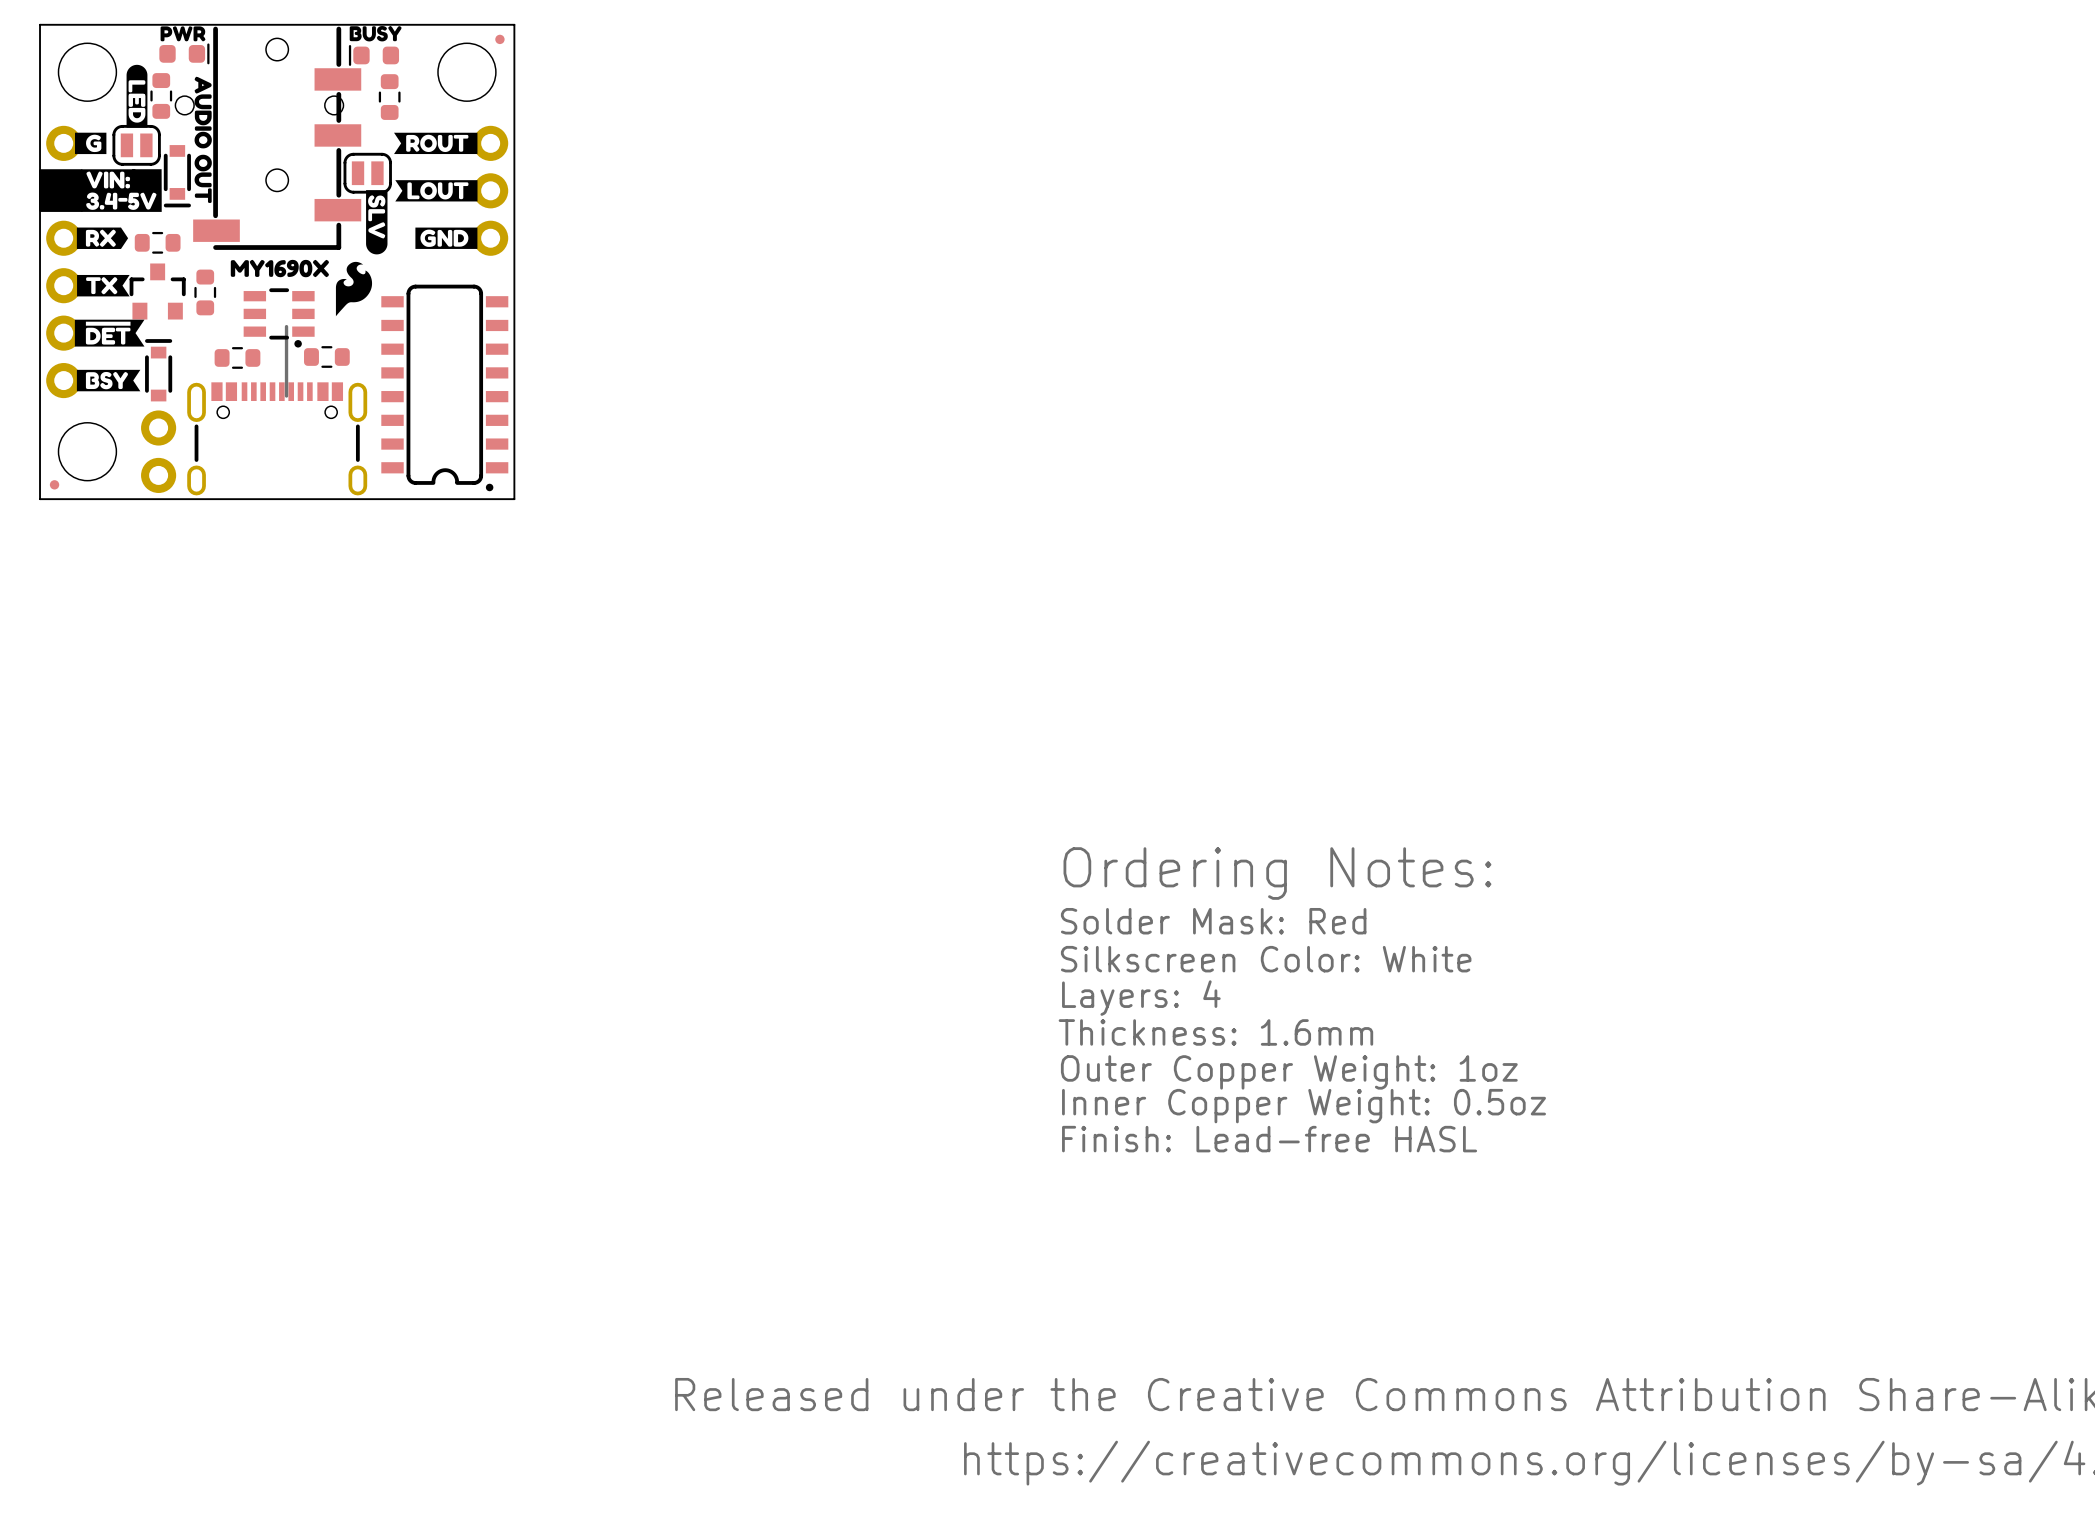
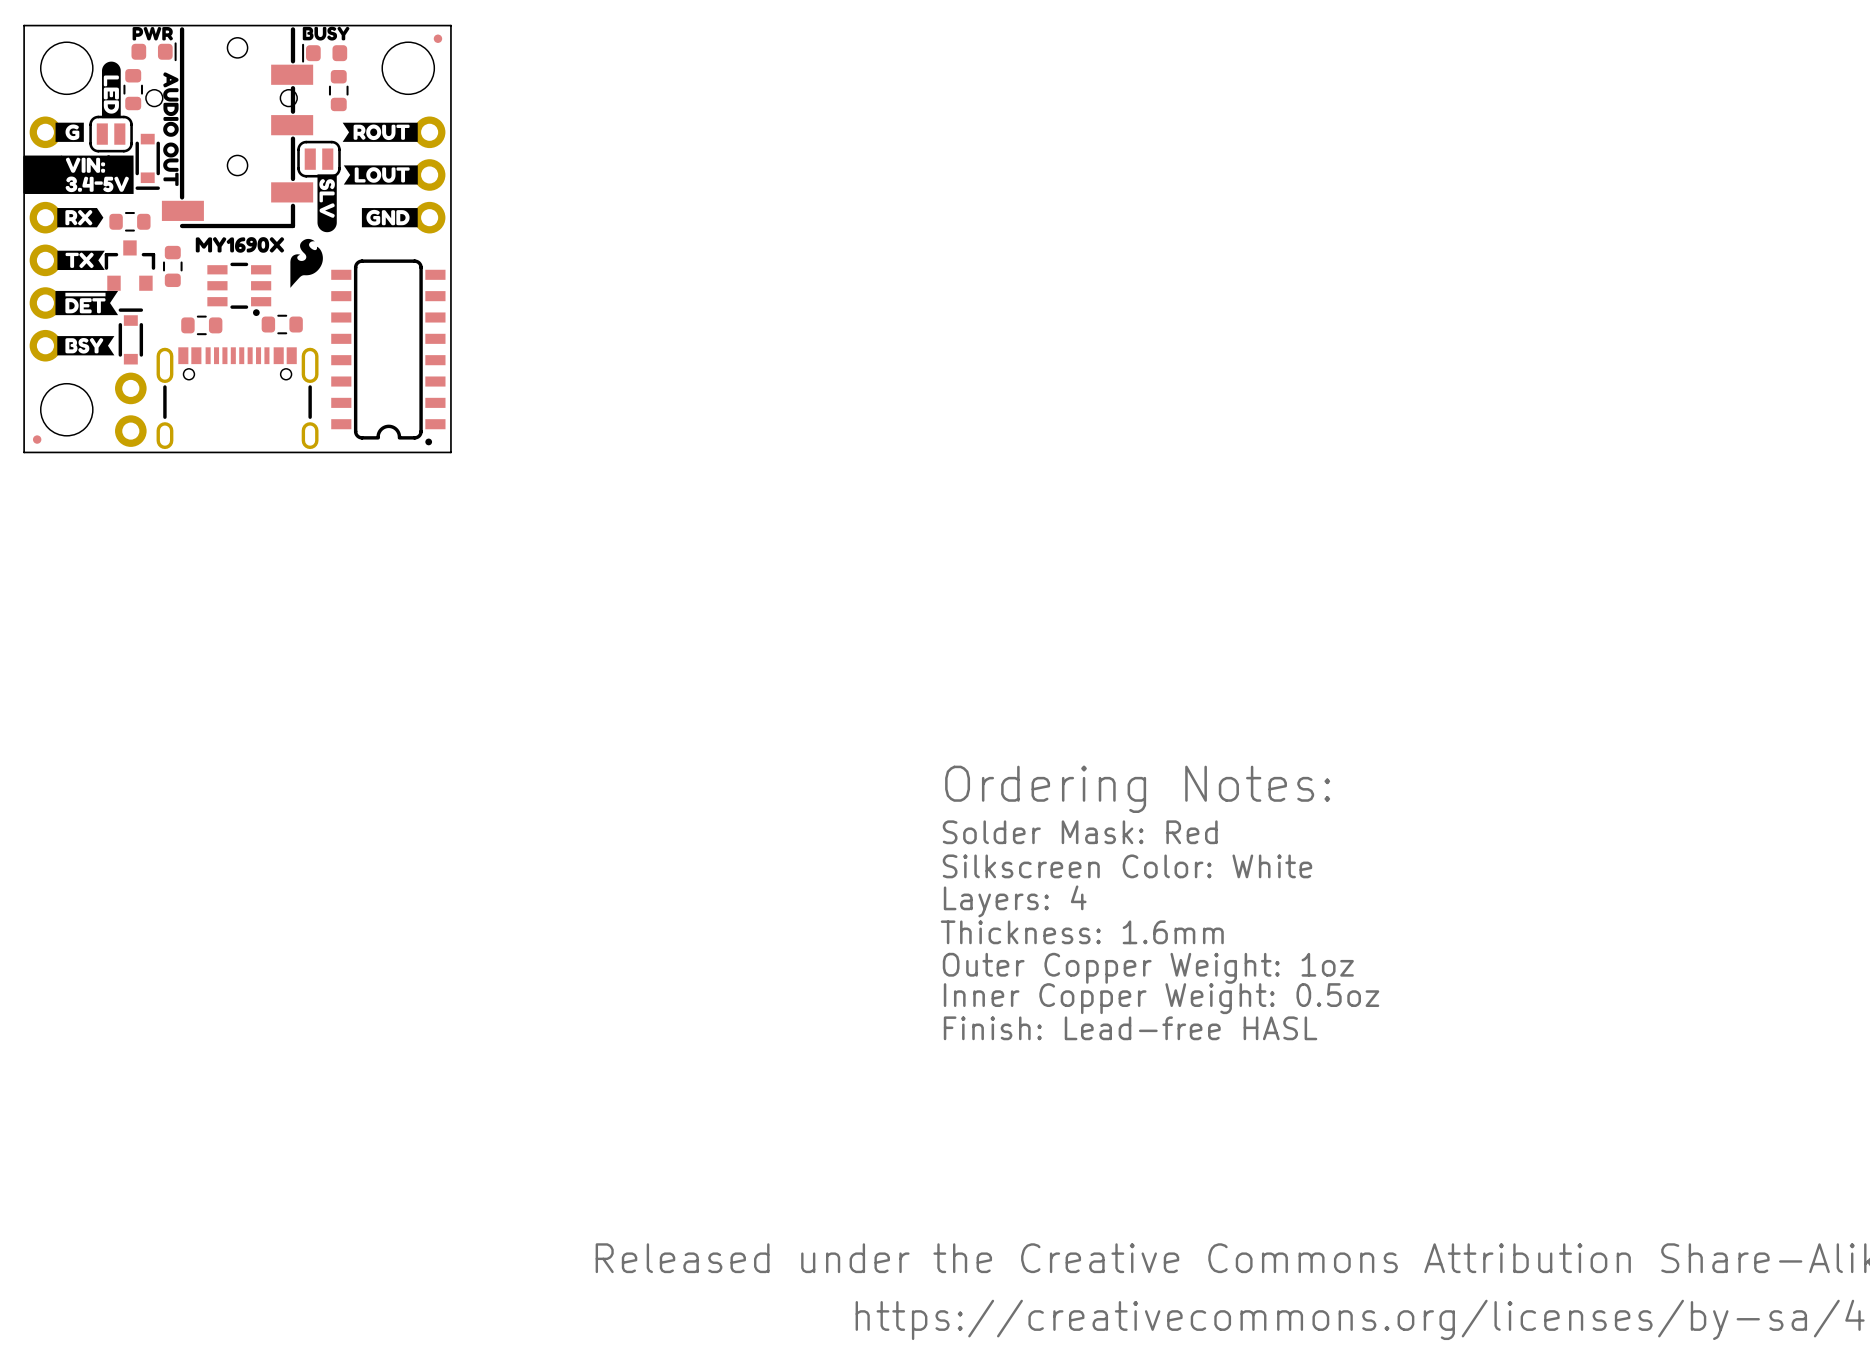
line: (286, 326) (286, 396) -> none

